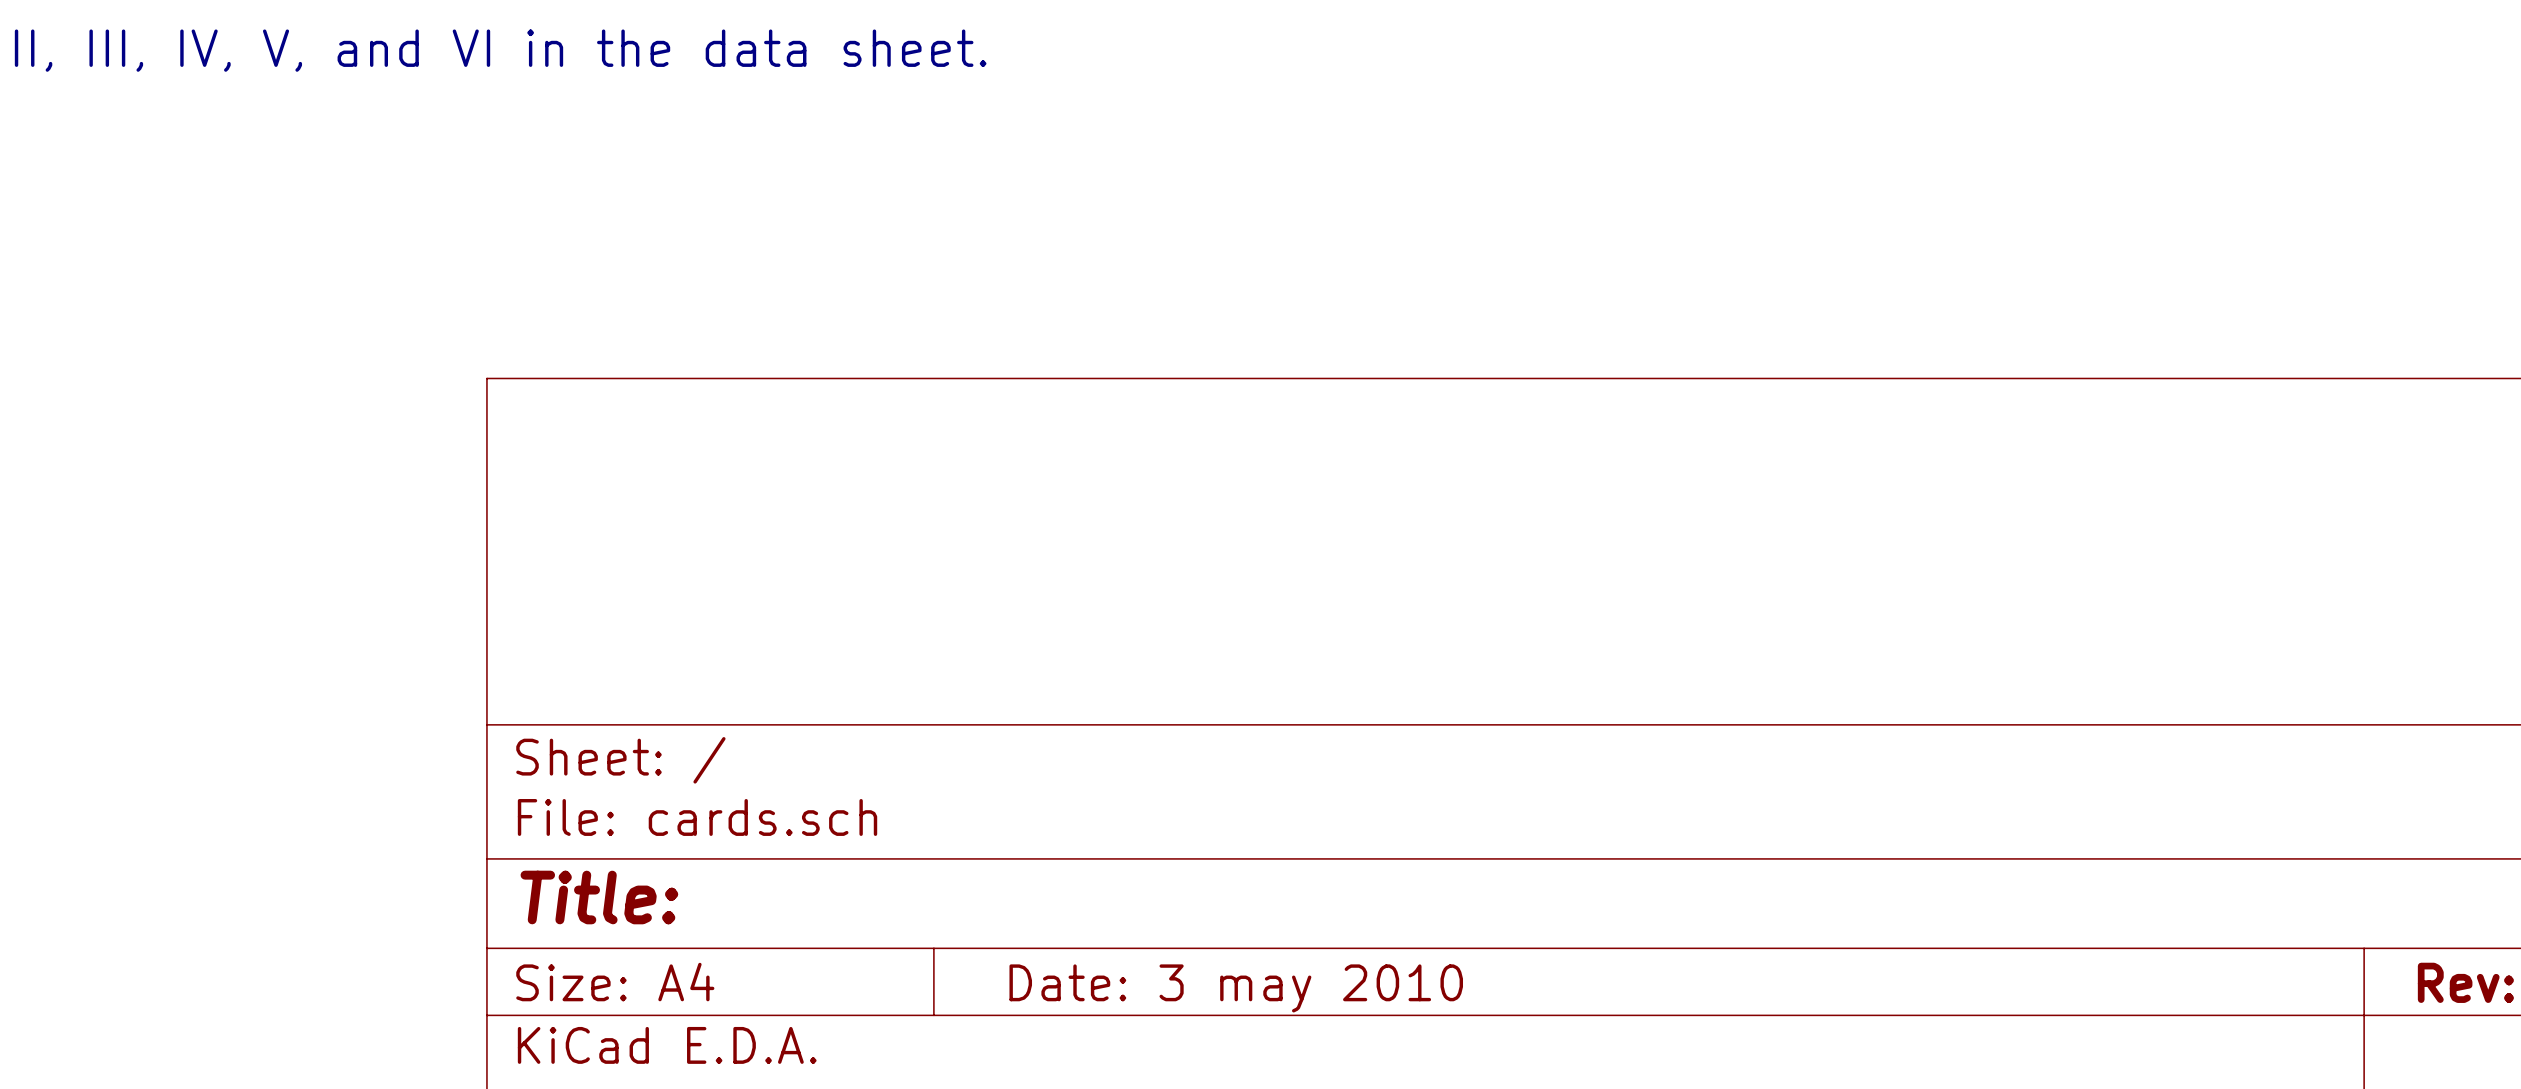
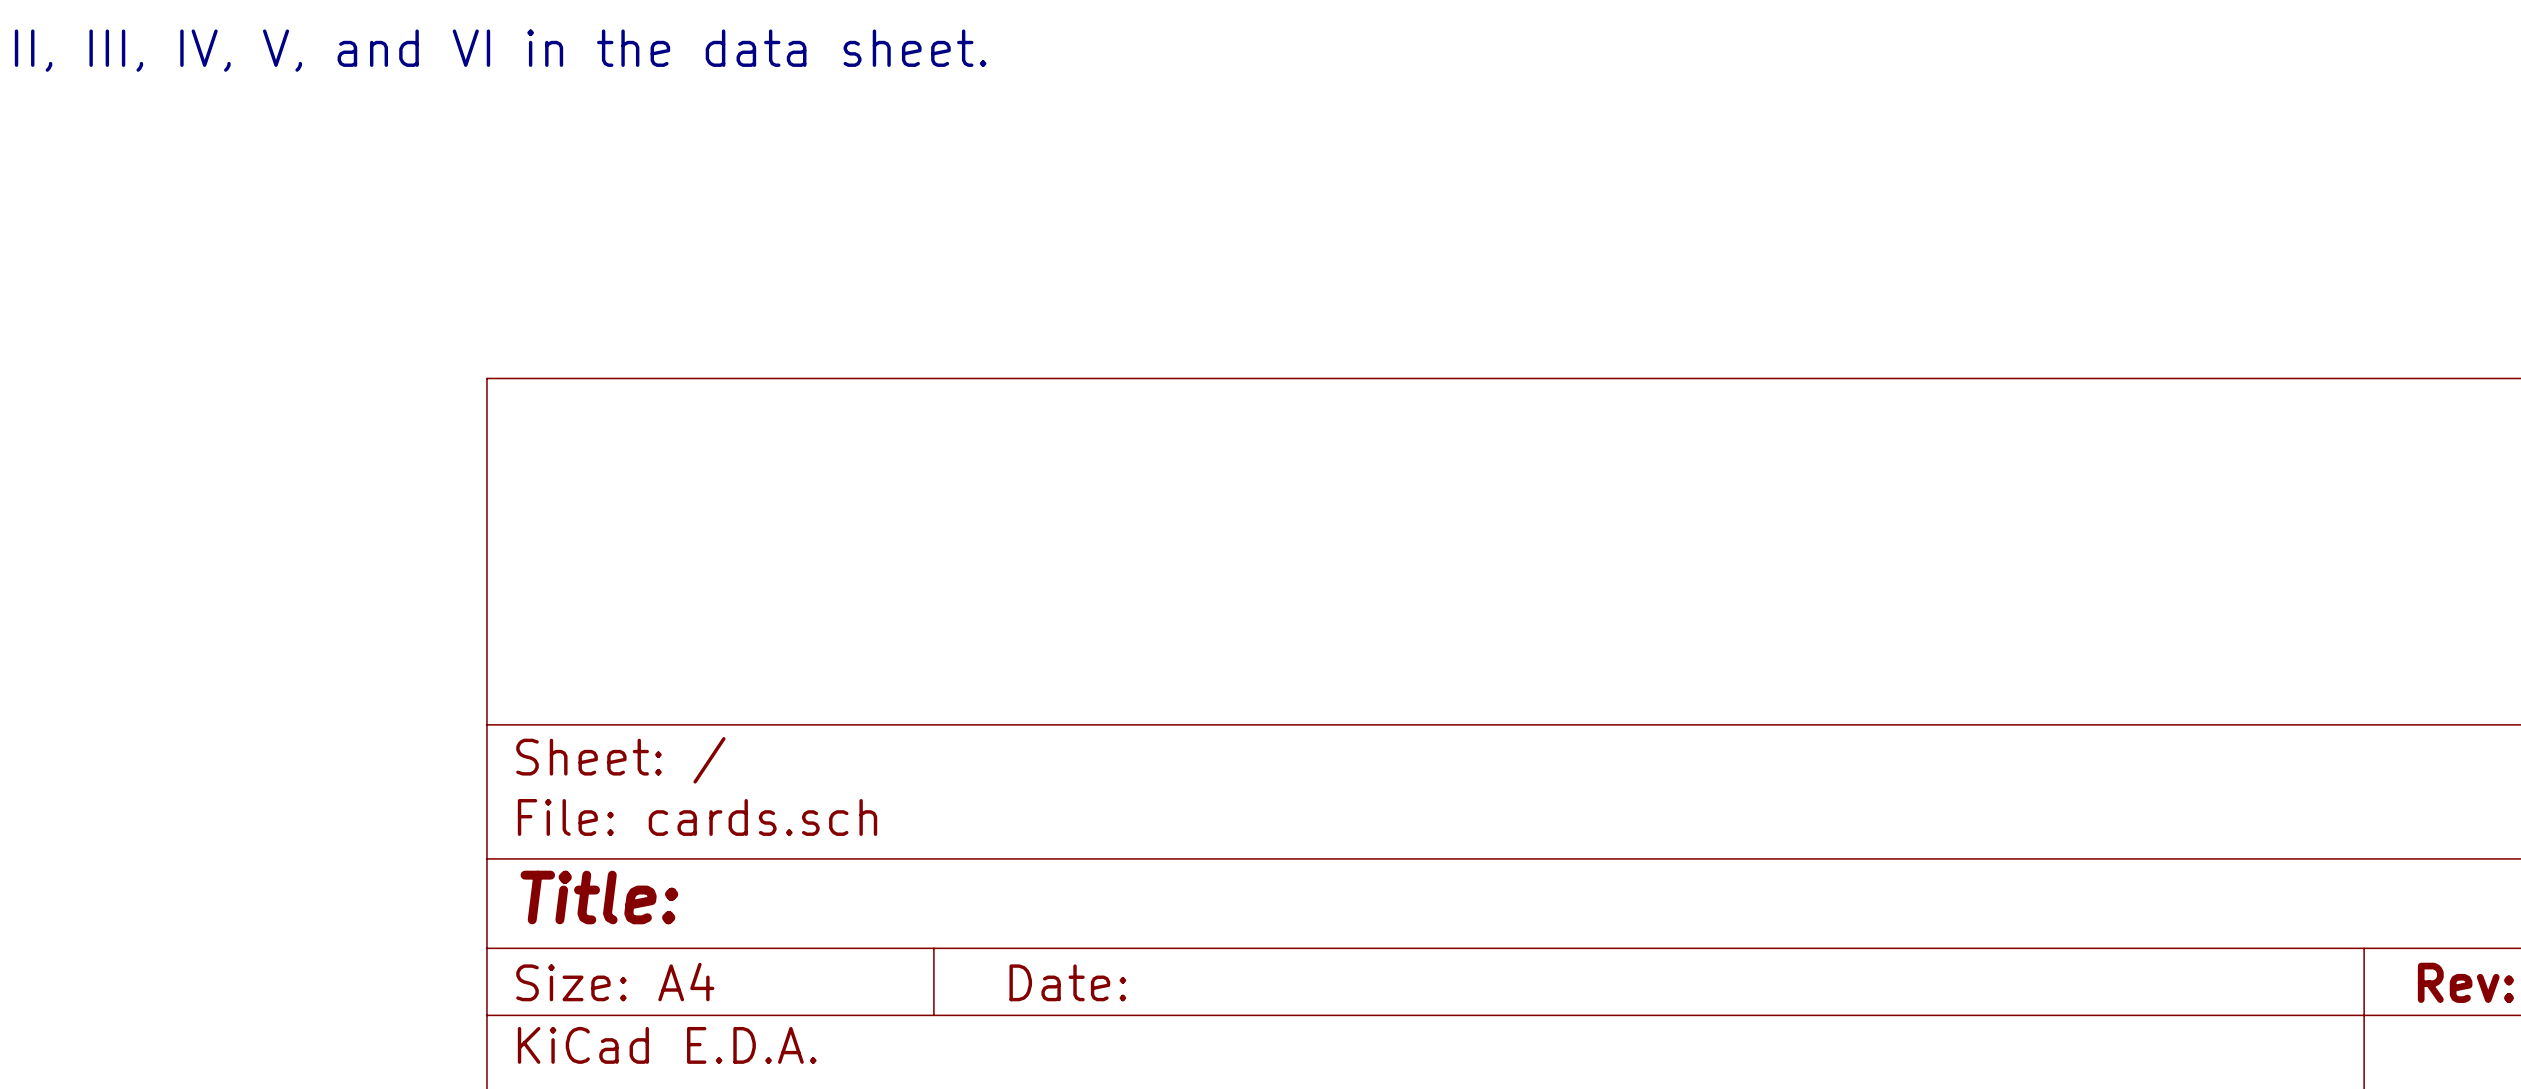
title block: Date: 3 may 2010 (1236, 988) -> Date: (1067, 982)

